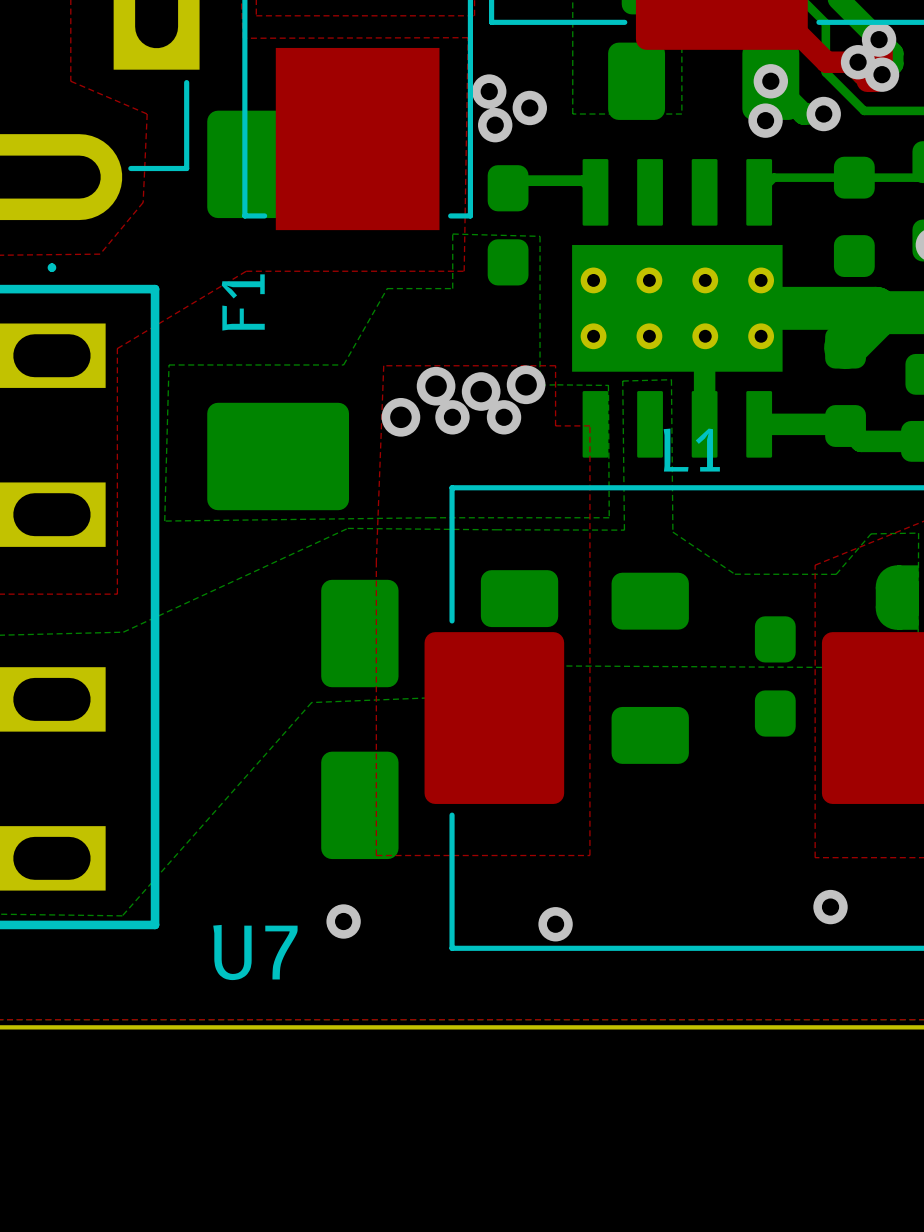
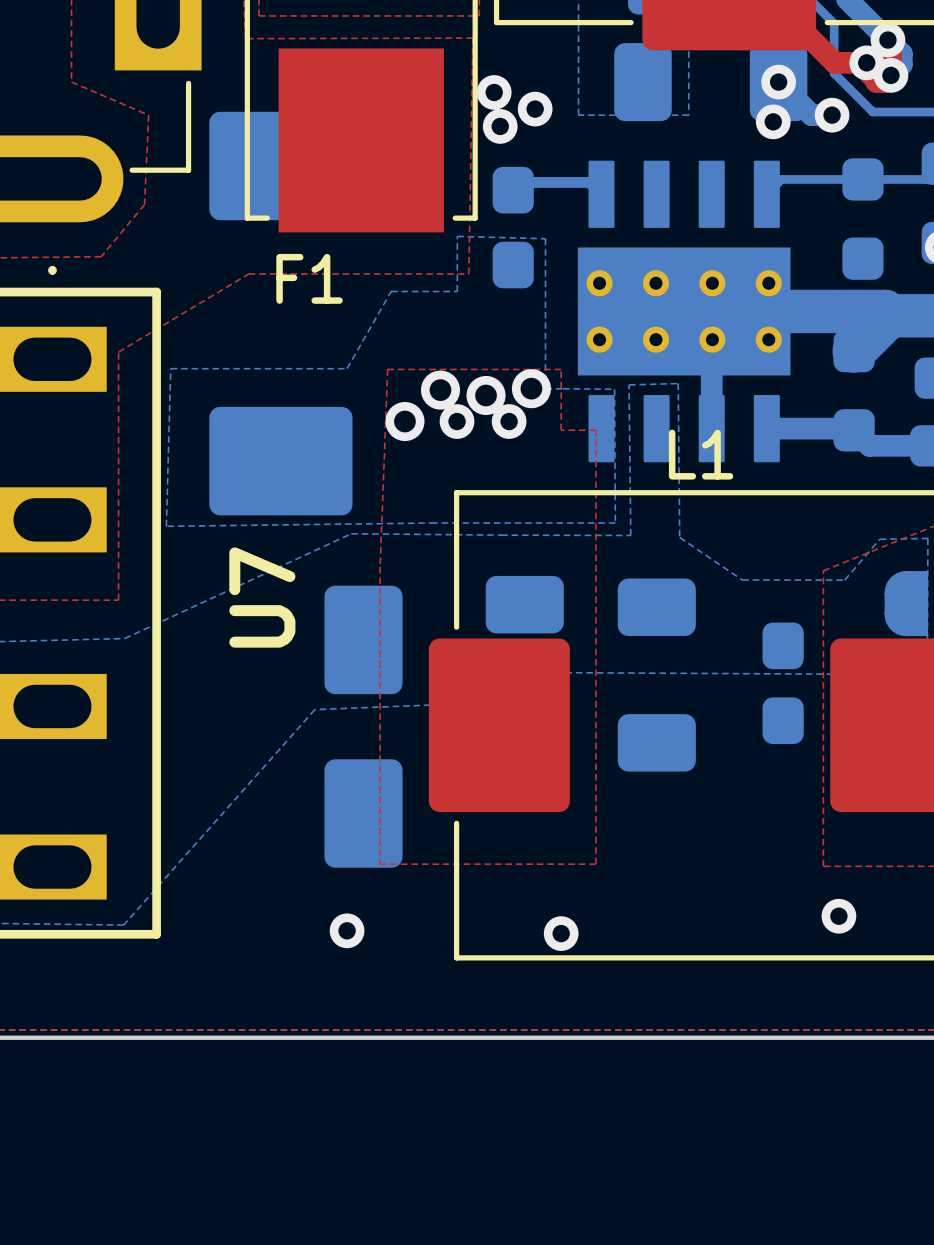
F1 name rotation: 0° (243, 302) -> 90° clockwise (309, 278)
U7 name rotation: 0° (255, 952) -> 90° counterclockwise (262, 597)
U7 name position: U7 (255, 952) -> U7 (262, 597)

